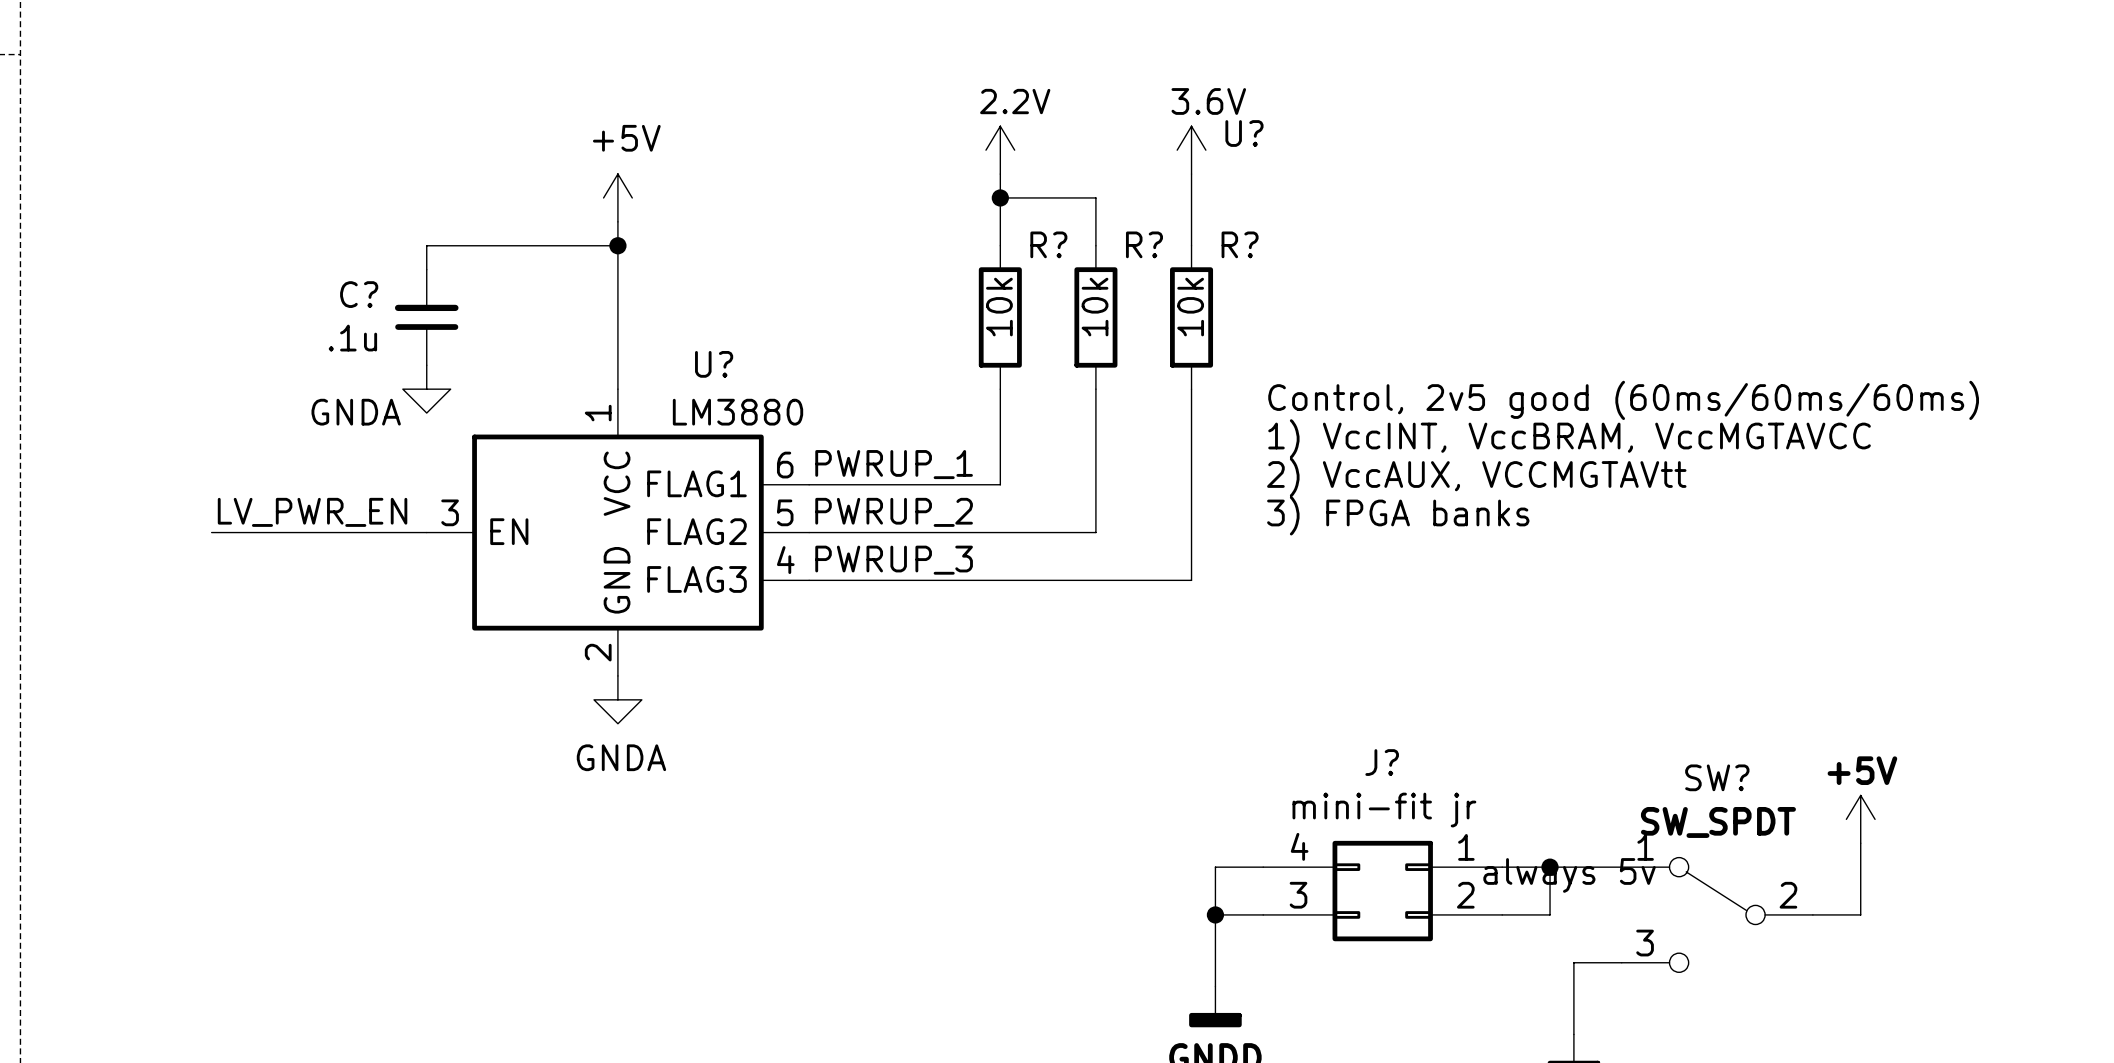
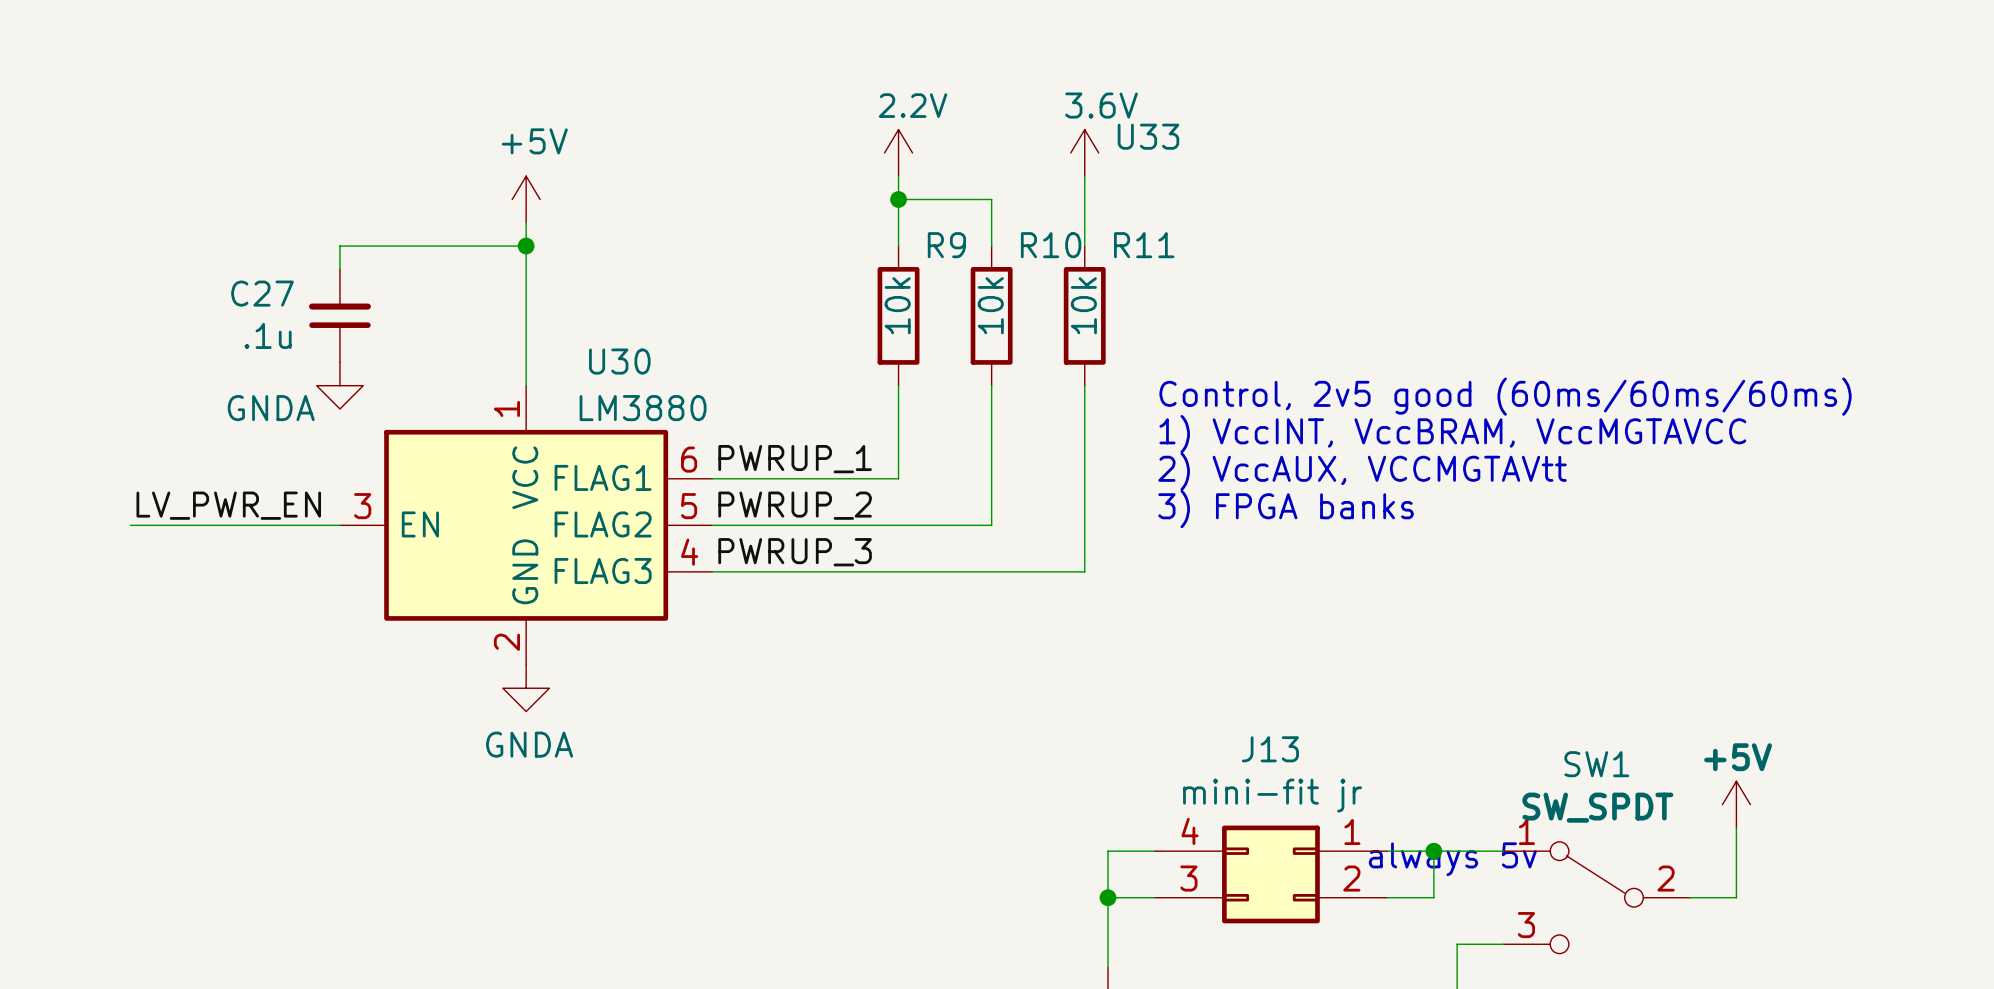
U? name: U? (1244, 133) -> U33 (1148, 136)
R? name: R? (1048, 244) -> R9 (946, 245)
R? name: R? (1144, 244) -> R10 (1051, 245)
R? name: R? (1240, 244) -> R11 (1144, 245)
C? name: C? (359, 294) -> C27 (262, 293)
U? name: U? (714, 364) -> U30 (619, 361)
J? name: J? (1382, 762) -> J13 (1270, 749)
SW? name: SW? (1717, 777) -> SW1 (1596, 764)

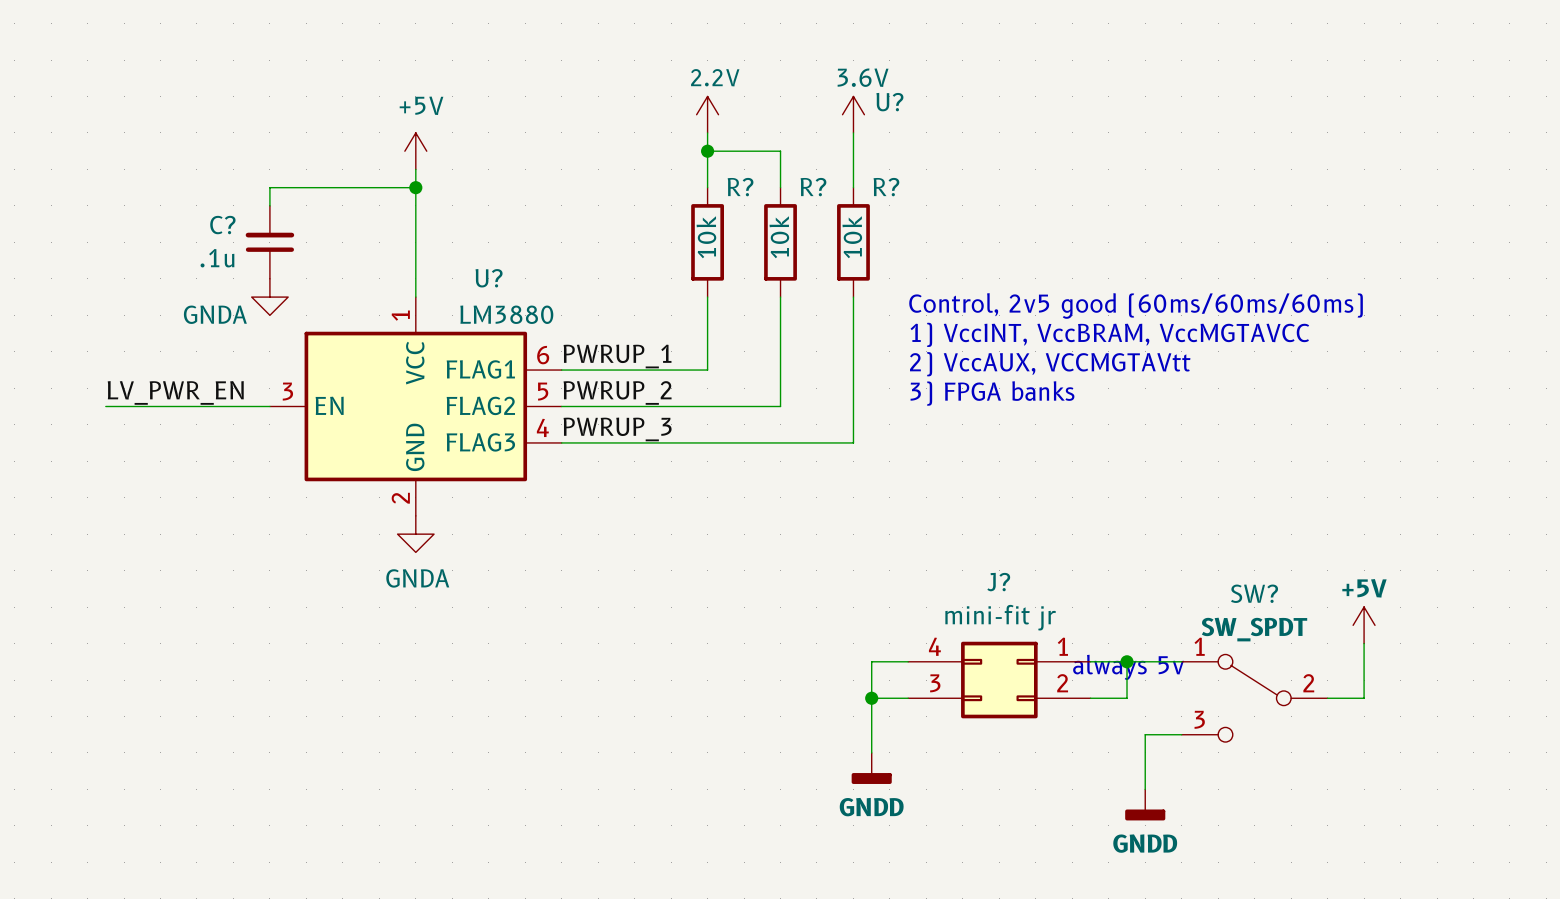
U33 name: U33 (1148, 136) -> U? (889, 102)
R9 name: R9 (946, 245) -> R? (740, 187)
R10 name: R10 (1051, 245) -> R? (813, 187)
R11 name: R11 (1144, 245) -> R? (886, 187)
C27 name: C27 (262, 293) -> C? (222, 225)
U30 name: U30 (619, 361) -> U? (489, 278)
J13 name: J13 (1270, 749) -> J? (998, 582)
SW1 name: SW1 (1596, 764) -> SW? (1254, 593)

